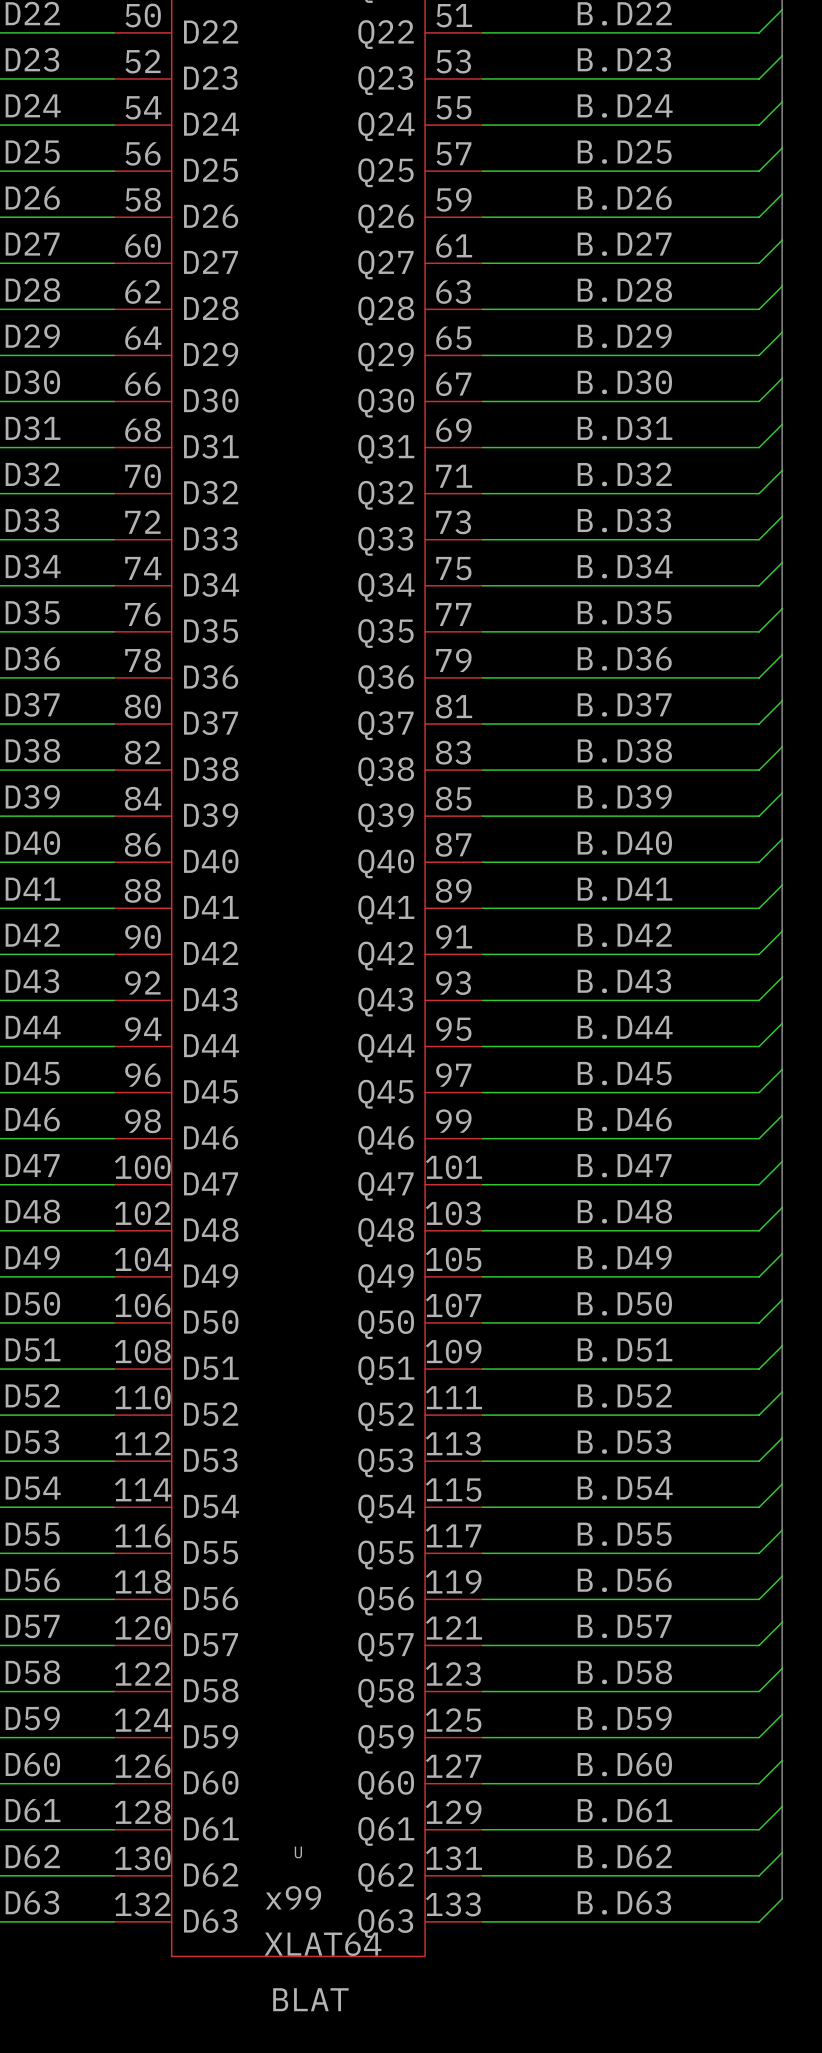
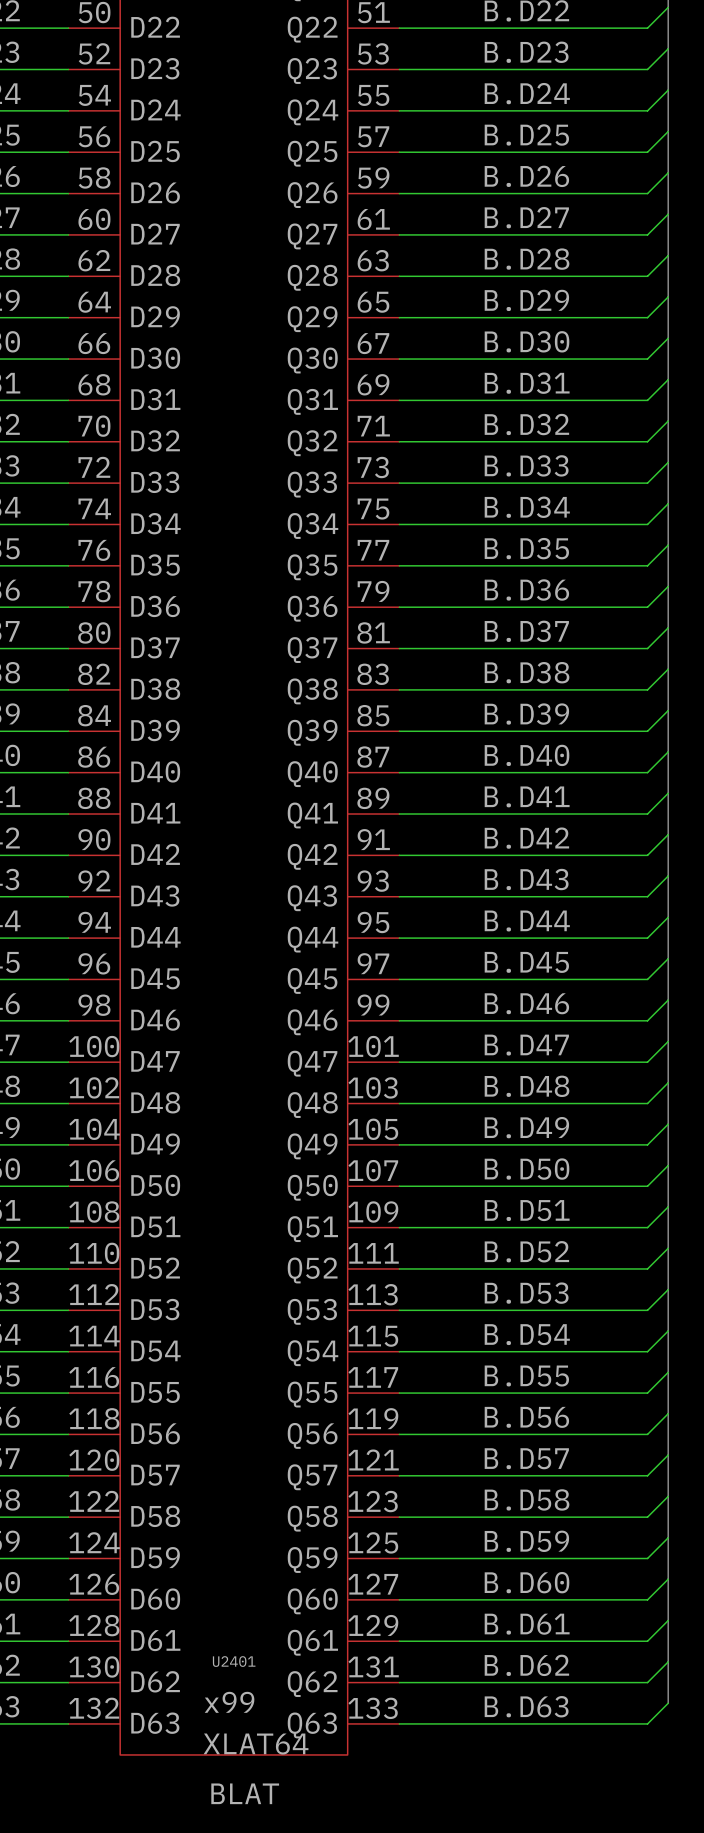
U name: U (298, 1852) -> U2401 (234, 1661)

